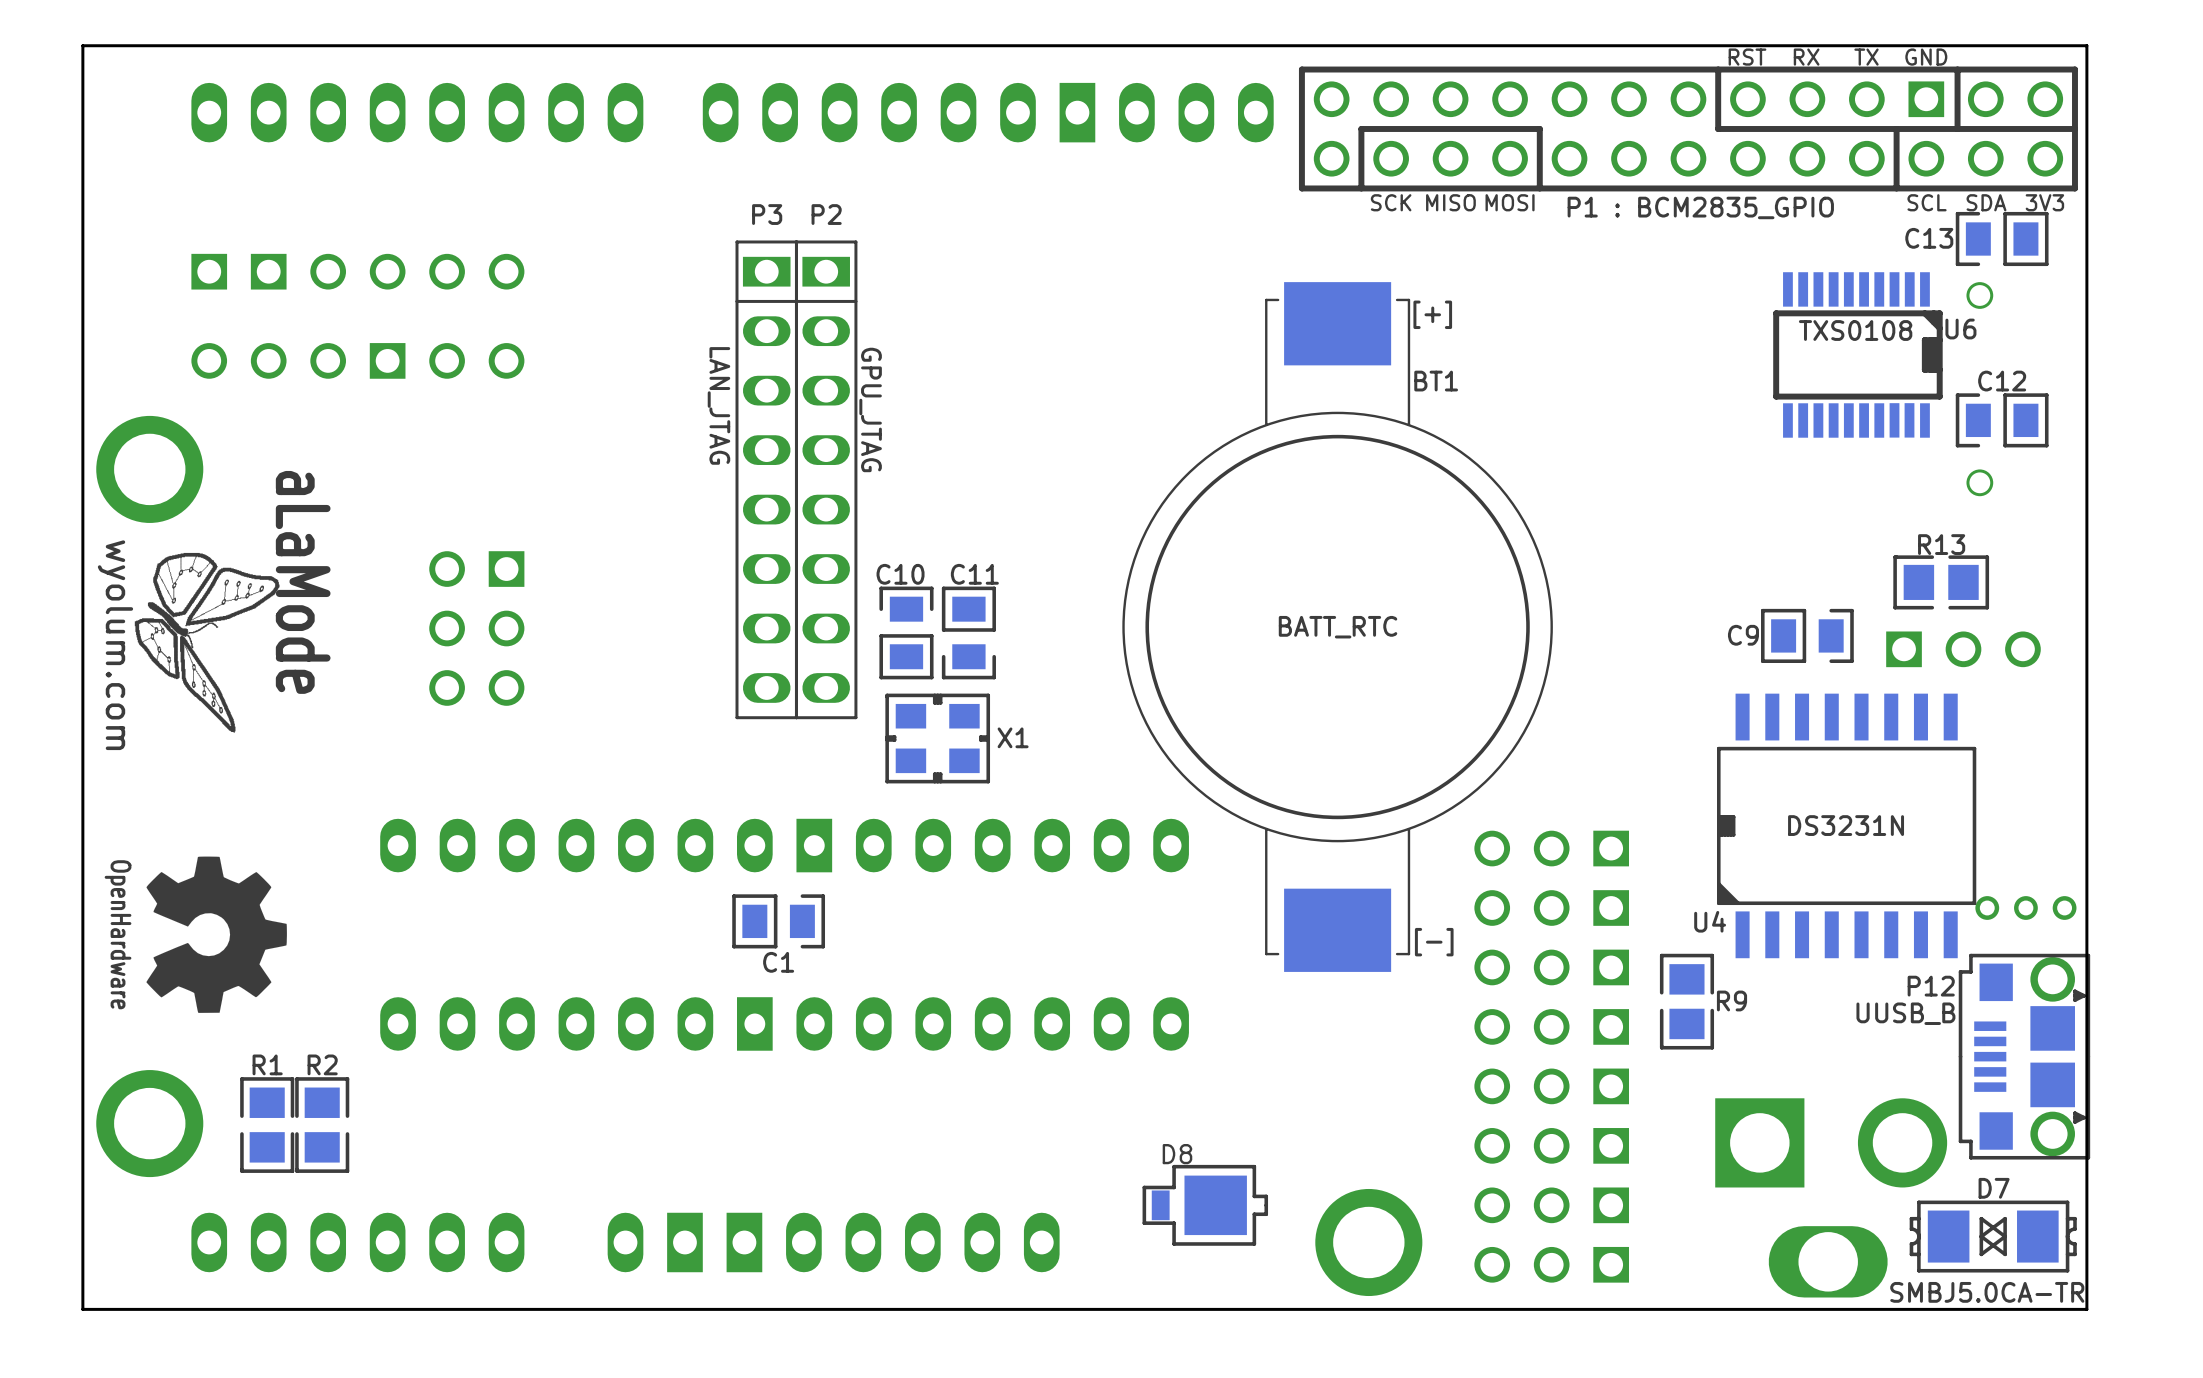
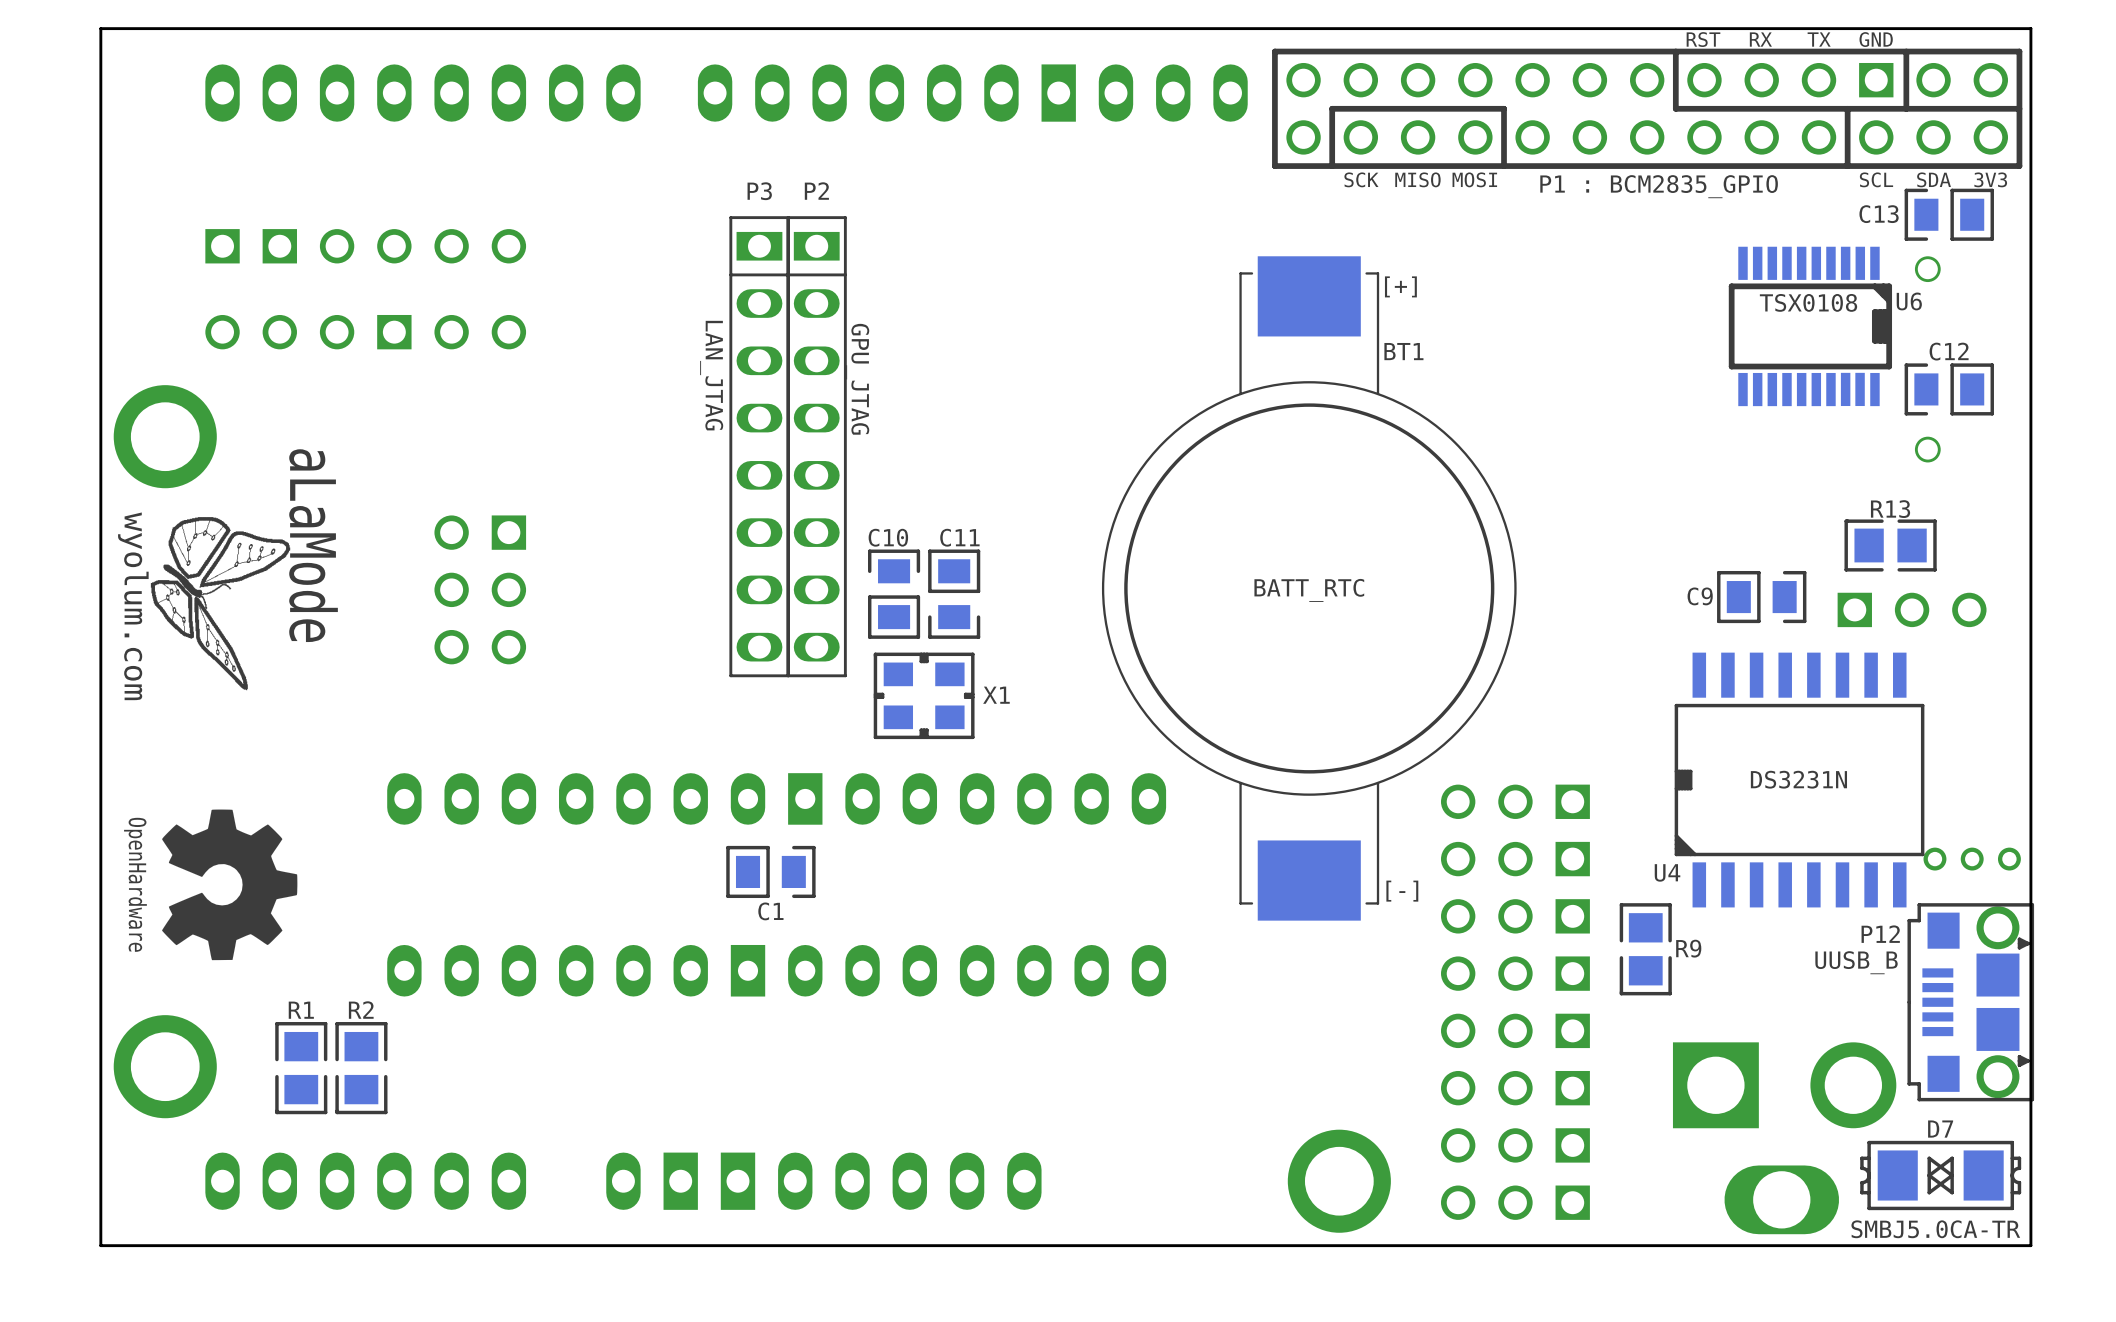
U6 value: TXS0108 (1855, 330) -> TSX0108 (1808, 302)
R1 position: (267, 1125) -> (301, 1068)
R2 position: (322, 1125) -> (361, 1068)
D8: (1205, 1205) -> none

